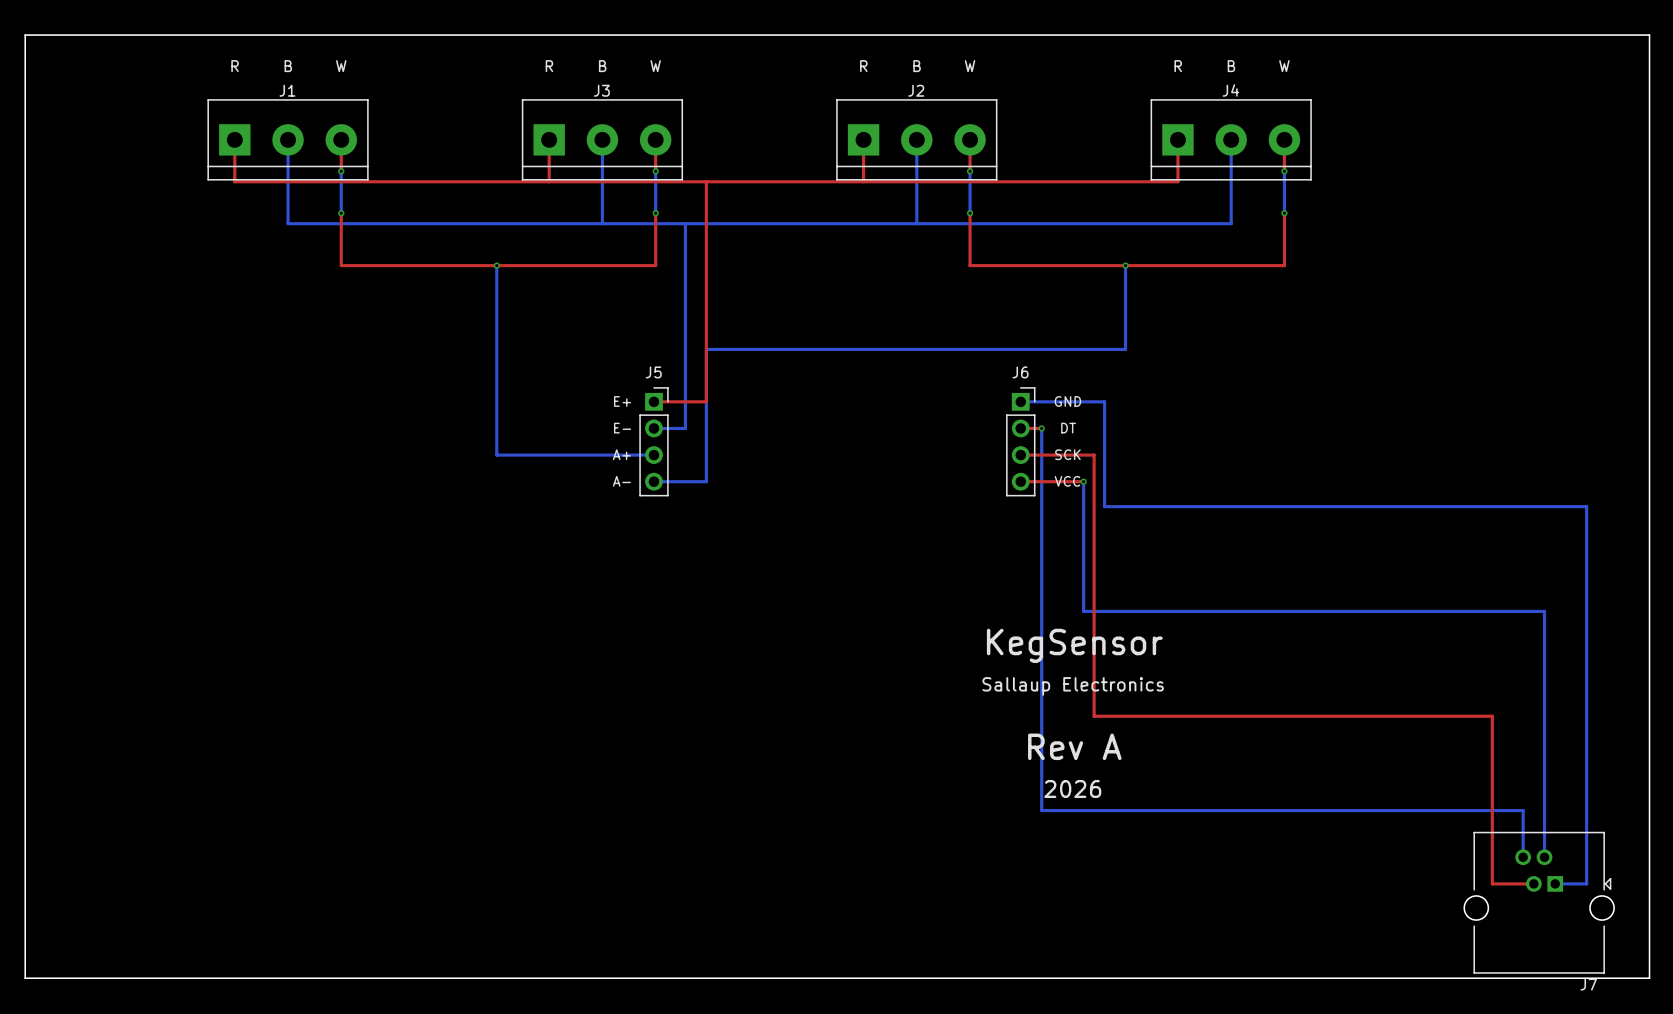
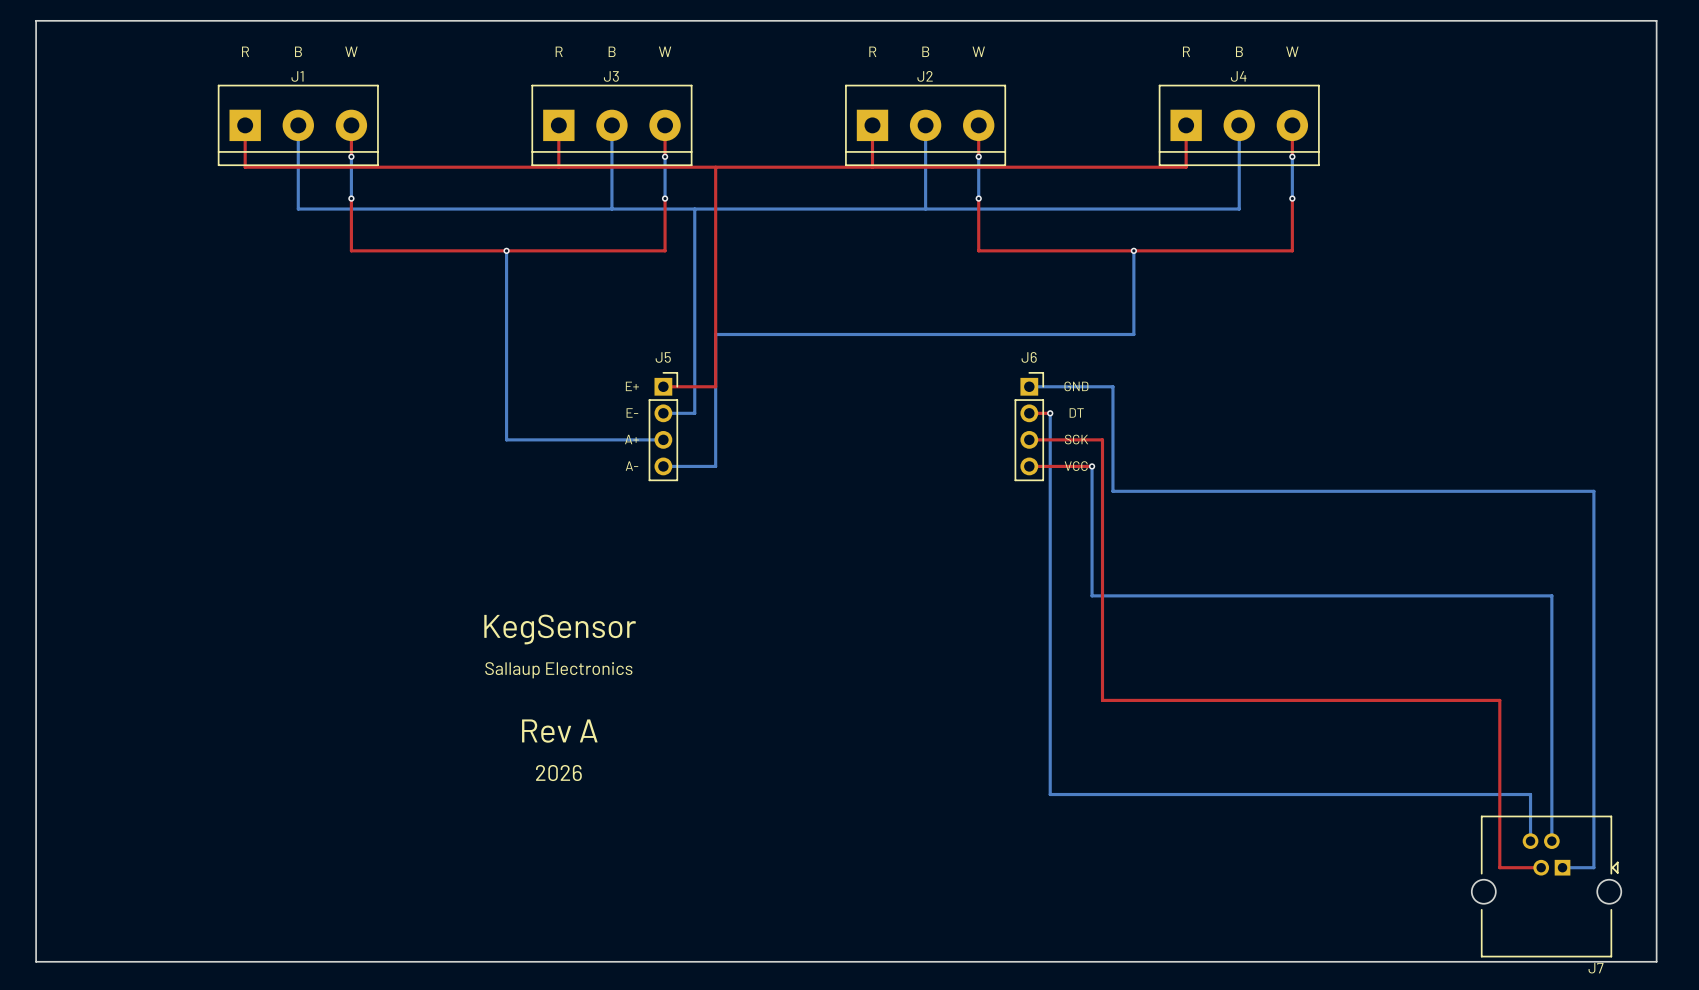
text: none -> KegSensor (560, 629)
text: KegSensor (1074, 645) -> none
text: none -> Sallaup Electronics (558, 670)
text: Sallaup Electronics (1073, 686) -> none
text: none -> Rev A (559, 731)
text: Rev A (1074, 746) -> none
text: none -> 2026 (558, 773)
text: 2026 (1072, 789) -> none

